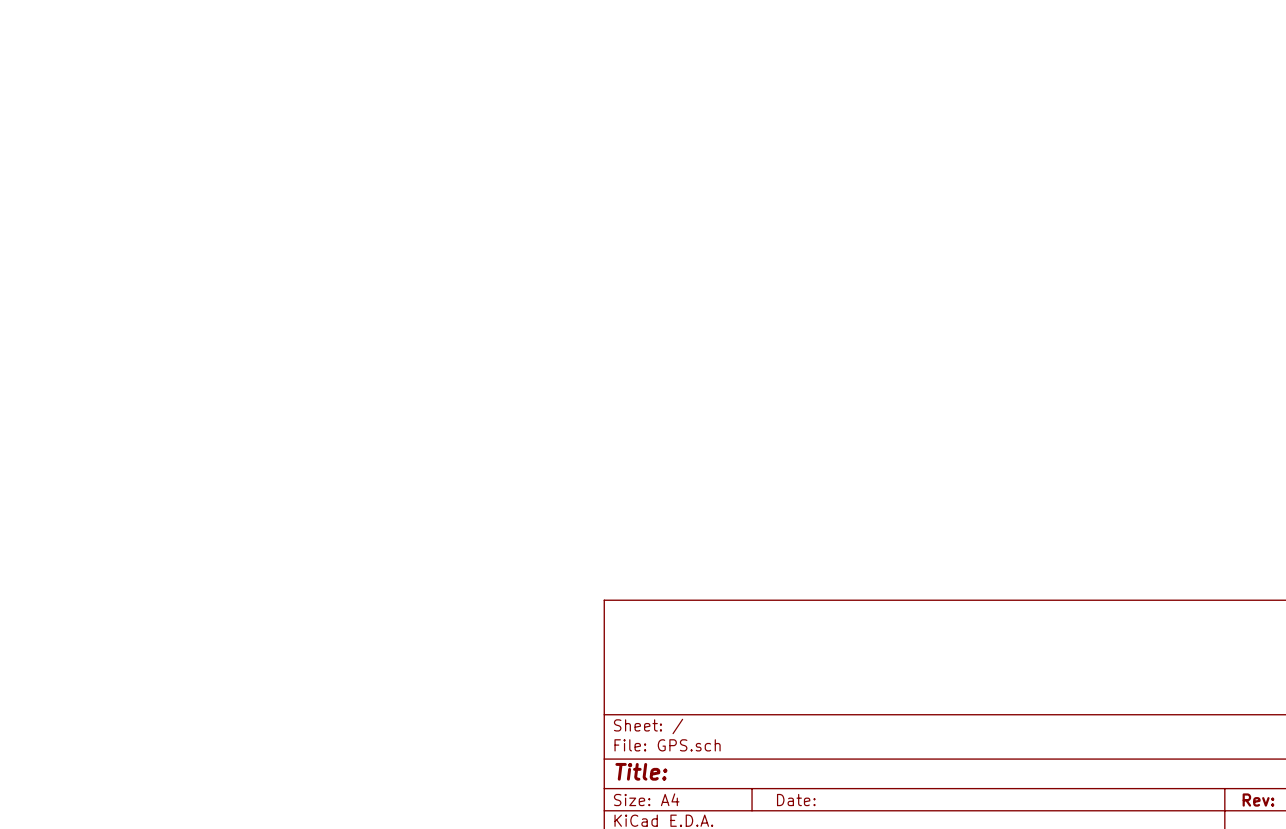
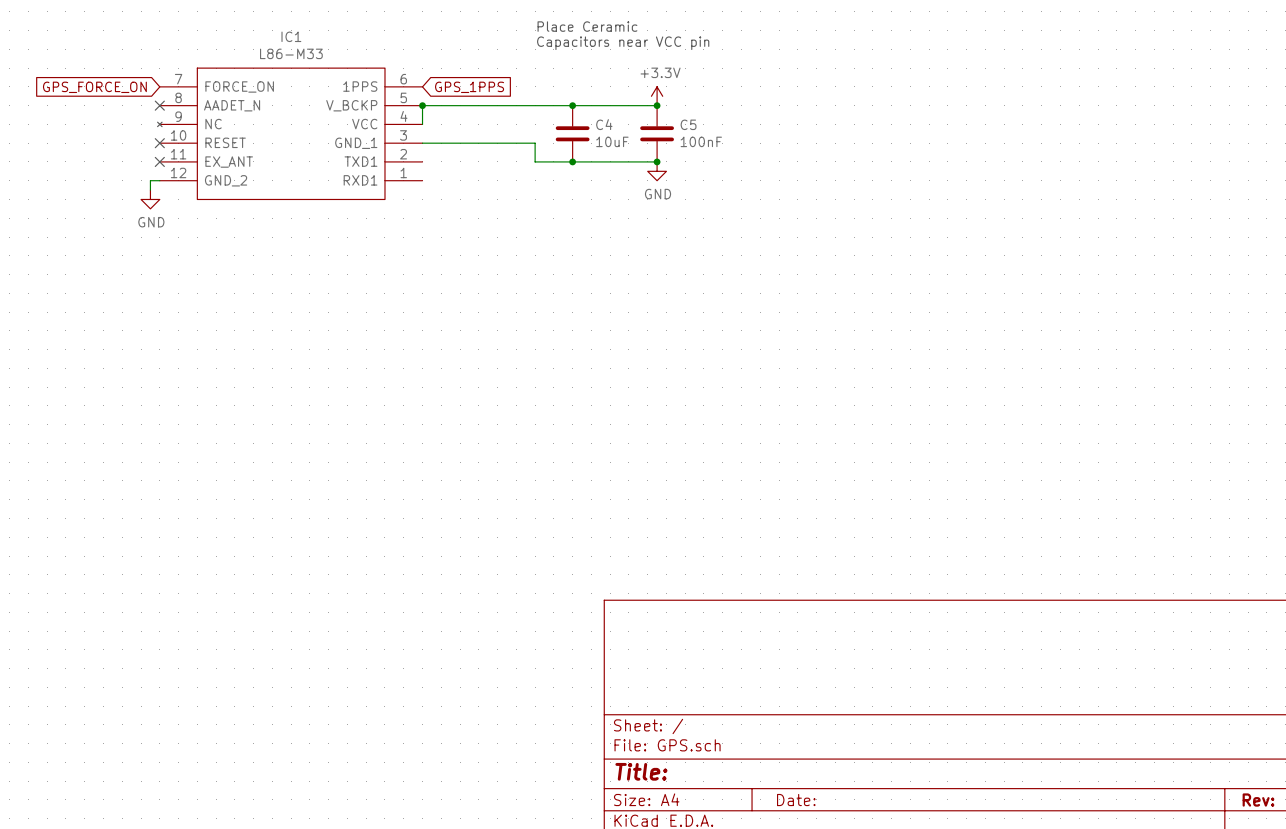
text: none -> Place Ceramic (587, 26)
text: none -> Capacitors near VCC pin (623, 43)
global label: none -> GPS_FORCE_ON (94, 87)
global label: none -> GPS_1PPS (469, 87)
power symbol: none -> +3.3V (657, 96)
no-connect mark: none -> (159, 105)
junction: none -> (422, 105)
junction: none -> (572, 105)
wire: none -> (657, 105) (422, 105) (422, 124)
junction: none -> (657, 105)
IC1: none -> L86-M33 (290, 133)
C4: none -> 10uF (572, 133)
C5: none -> 100nF (657, 133)
no-connect mark: none -> (159, 143)
wire: none -> (422, 143) (535, 143) (535, 161) (657, 161)
no-connect mark: none -> (159, 161)
junction: none -> (572, 161)
junction: none -> (657, 161)
power symbol: none -> GND (657, 171)
wire: none -> (159, 180) (150, 180) (150, 190)
power symbol: none -> GND (150, 199)

